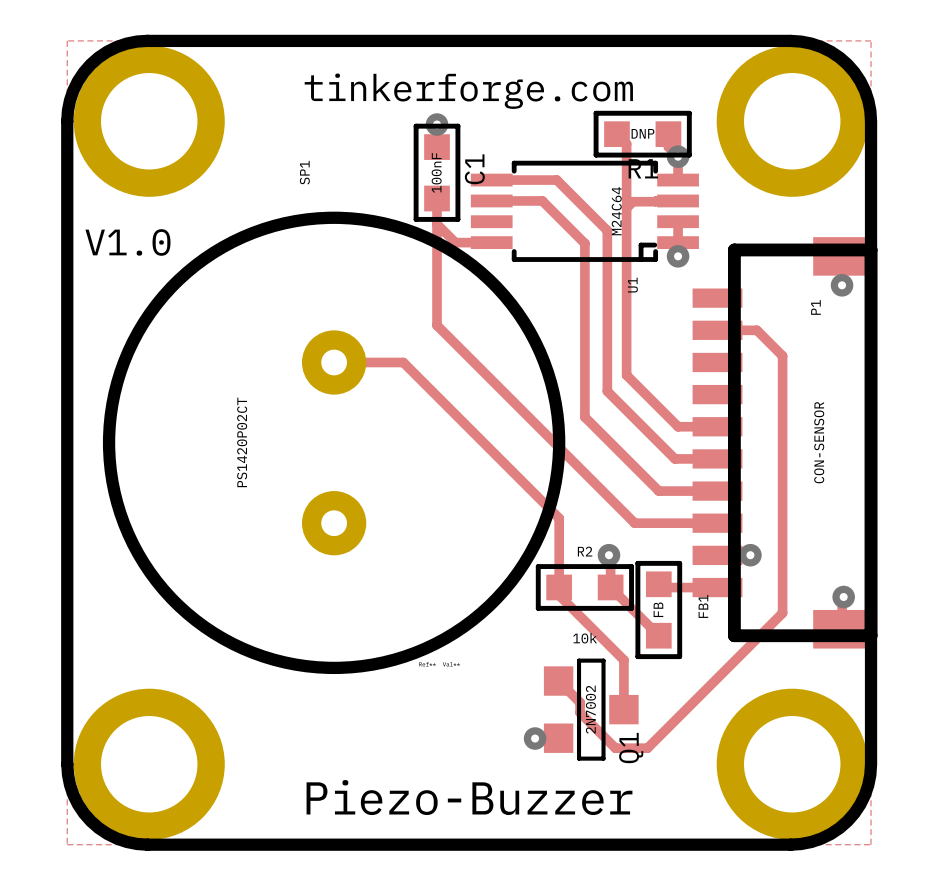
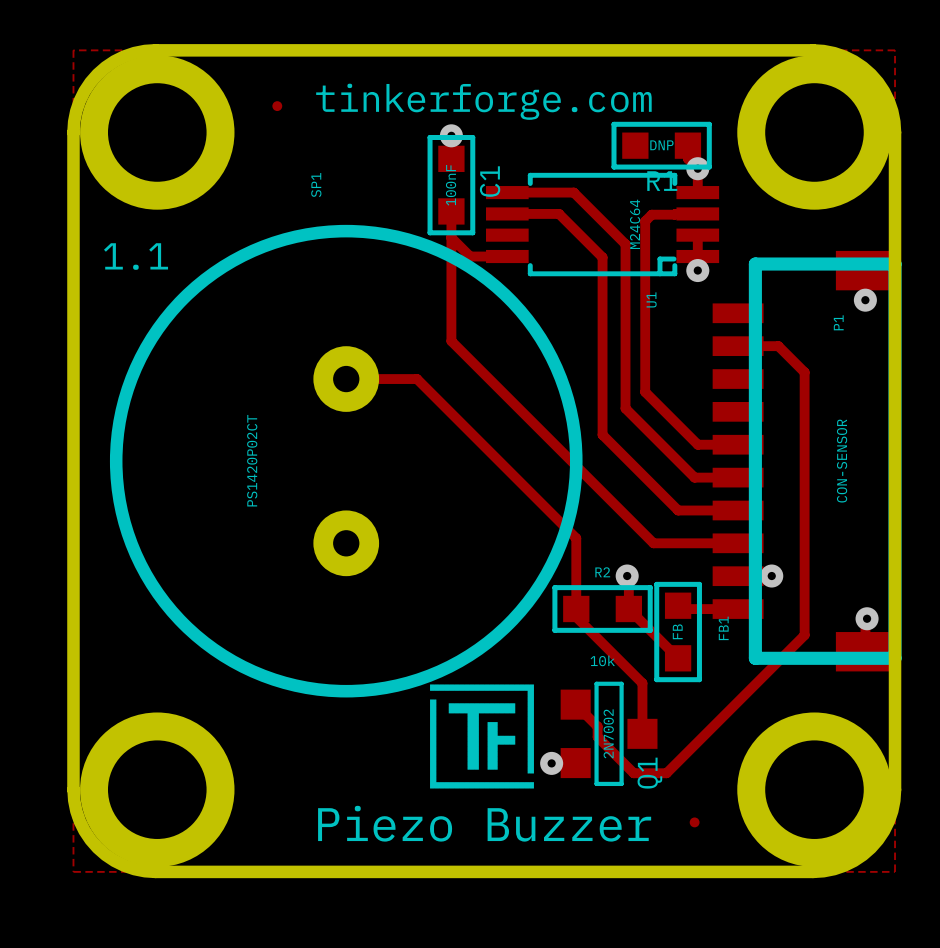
part: none -> (277, 106)
track: (616, 134) (626, 143) (626, 208) -> none
text: V1.0 (127, 242) -> 1.1 (136, 256)
drawing: none -> [430, 684, 534, 789]
part: none -> (694, 822)
text: Piezo-Buzzer (469, 797) -> Piezo Buzzer (484, 823)

